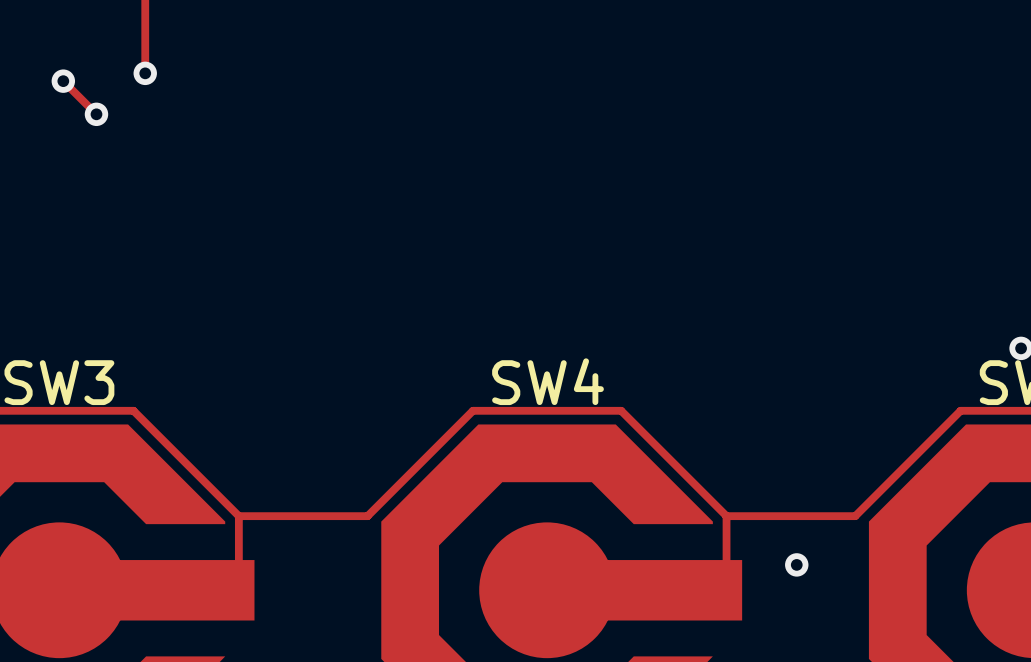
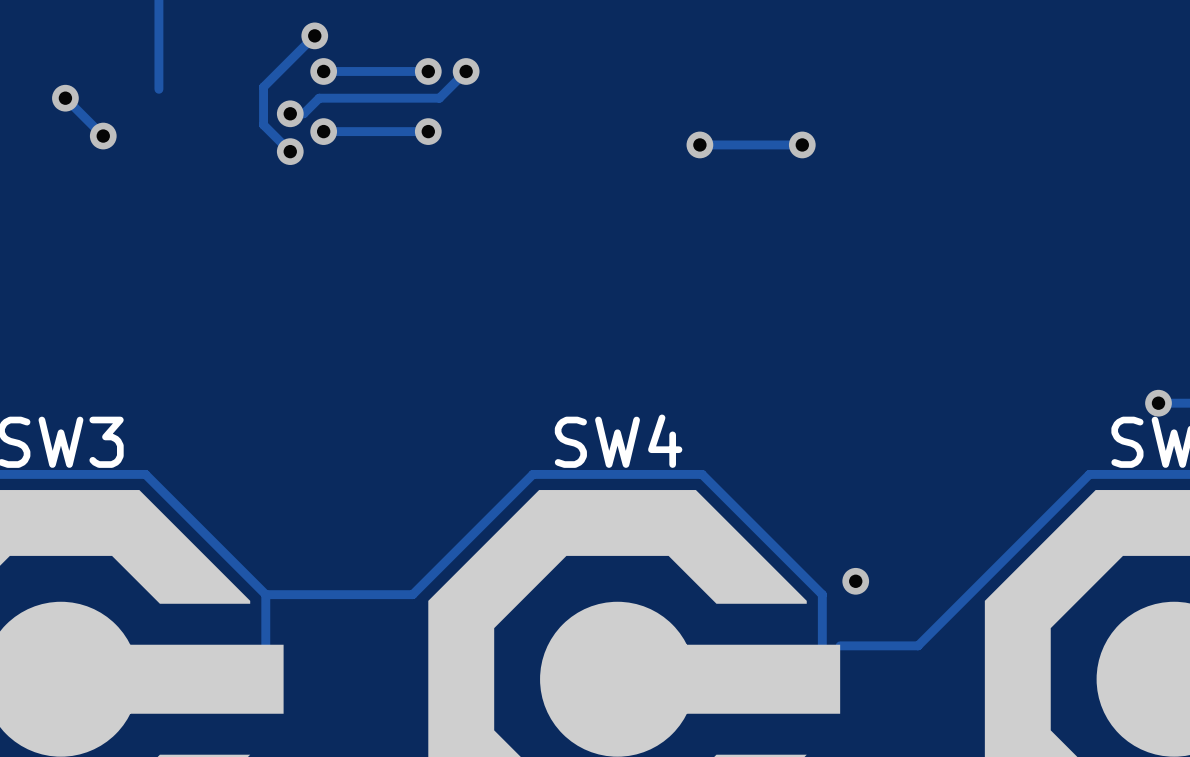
track: none -> (314, 35) (263, 87) (263, 124) (290, 151)
via: none -> (314, 35)
track: none -> (323, 71) (428, 71)
via: none -> (323, 71)
via: none -> (428, 71)
track: none -> (466, 71) (439, 98) (319, 98) (303, 113) (290, 113)
via: none -> (466, 71)
via: (145, 73) -> none
via: none -> (290, 113)
track: none -> (323, 131) (428, 131)
via: none -> (323, 131)
via: none -> (428, 131)
track: none -> (699, 144) (802, 144)
via: none -> (699, 144)
via: none -> (802, 144)
via: none -> (290, 151)
track: (726, 516) (855, 516) -> (840, 645) (918, 645) (969, 594)
via position: (796, 564) -> (855, 581)

